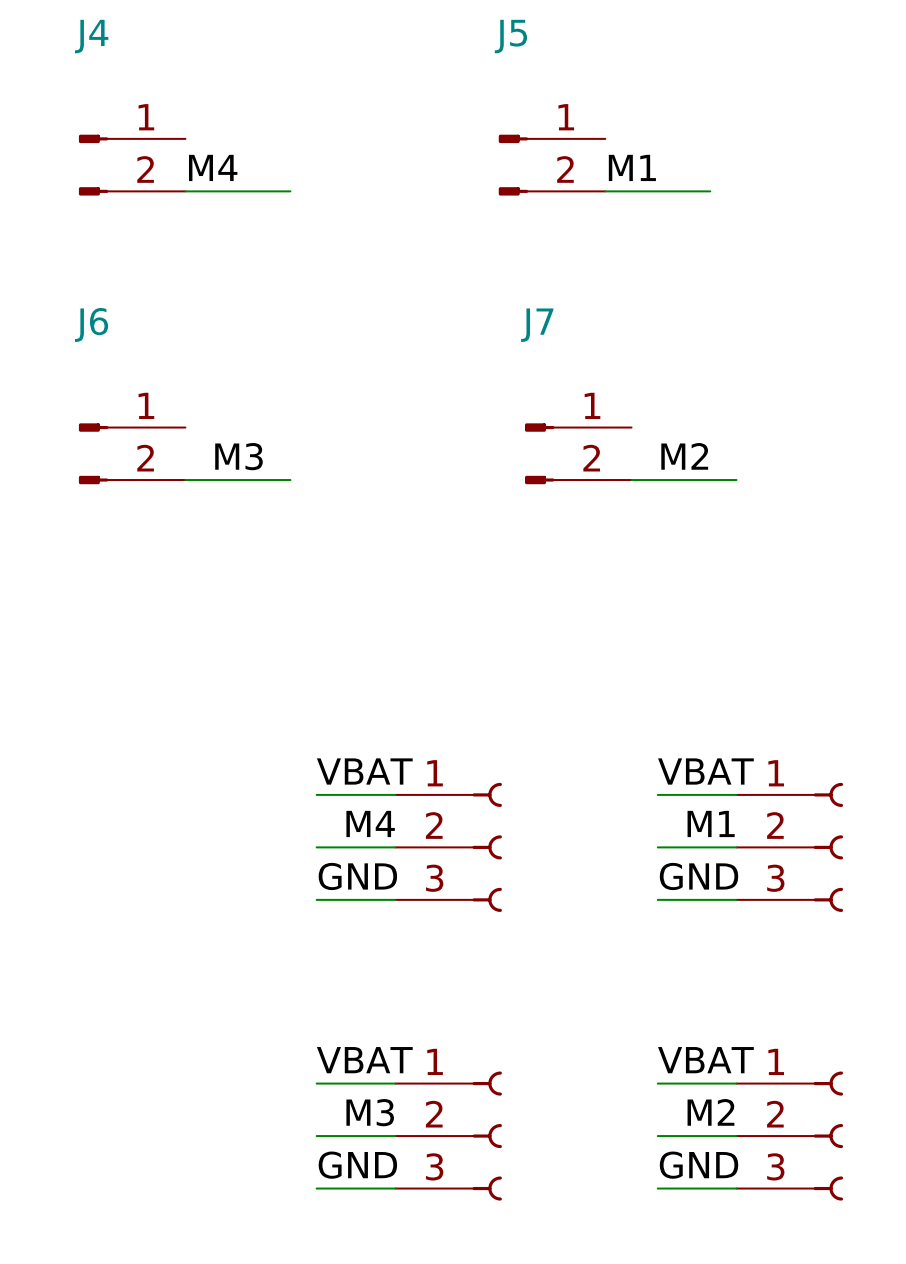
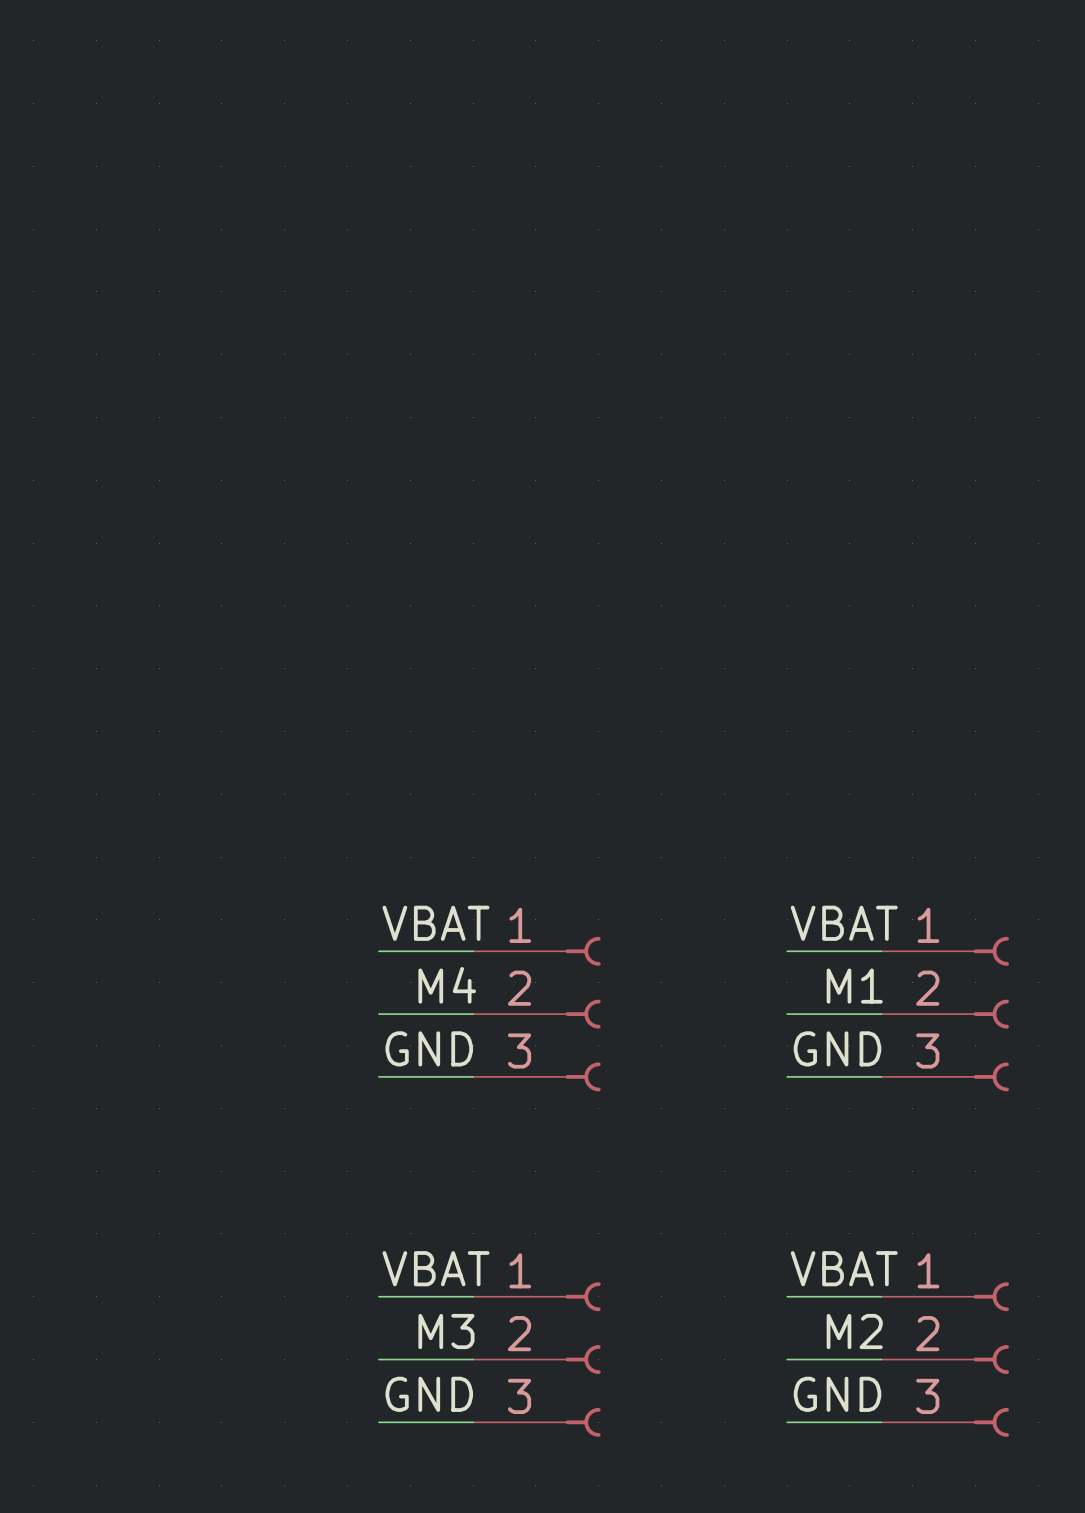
J4: (132, 165) -> none
J5: (552, 165) -> none
label: M4 (213, 167) -> none
label: M1 (632, 167) -> none
wire: (185, 191) (290, 191) -> none
wire: (605, 191) (710, 191) -> none
J6: (132, 453) -> none
J7: (578, 453) -> none
label: M3 (238, 456) -> none
label: M2 (684, 456) -> none
wire: (185, 480) (290, 480) -> none
wire: (631, 480) (736, 480) -> none

